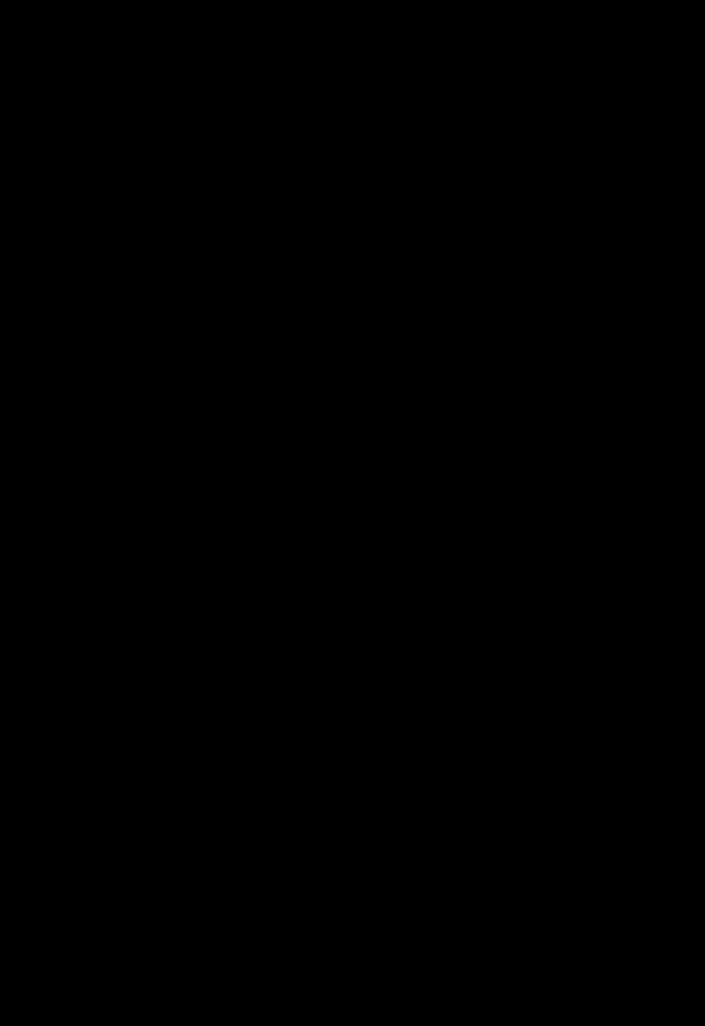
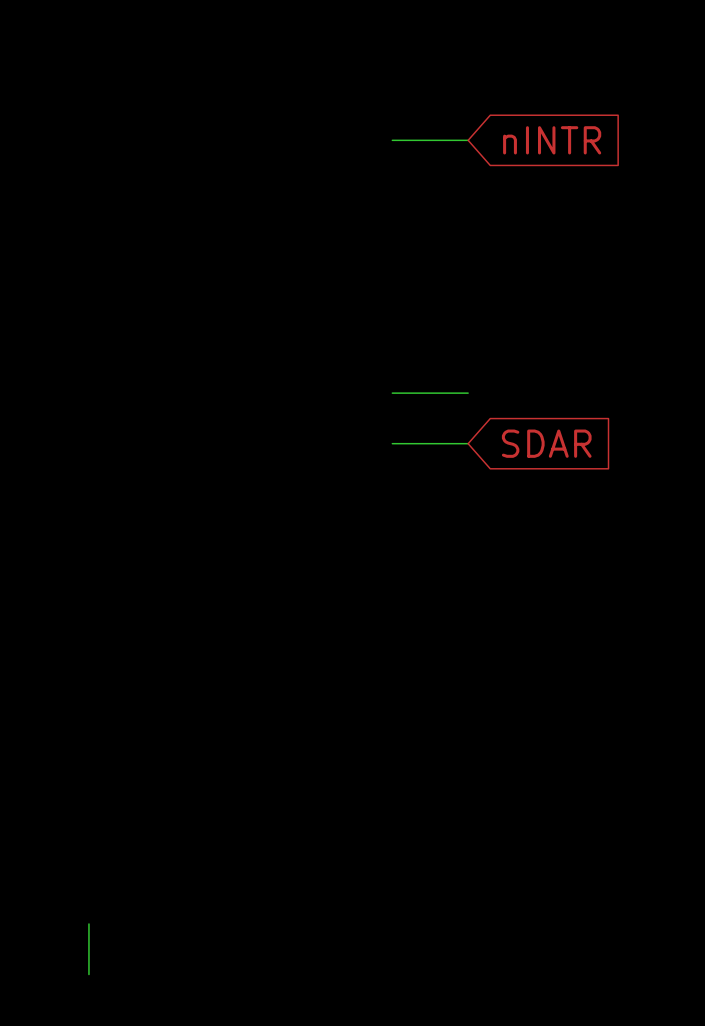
wire: none -> (392, 140) (468, 140)
global label: none -> nINTR (552, 140)
wire: none -> (392, 393) (468, 393)
wire: none -> (392, 443) (468, 443)
global label: none -> SDAR (546, 443)
wire: none -> (88, 923) (88, 974)

